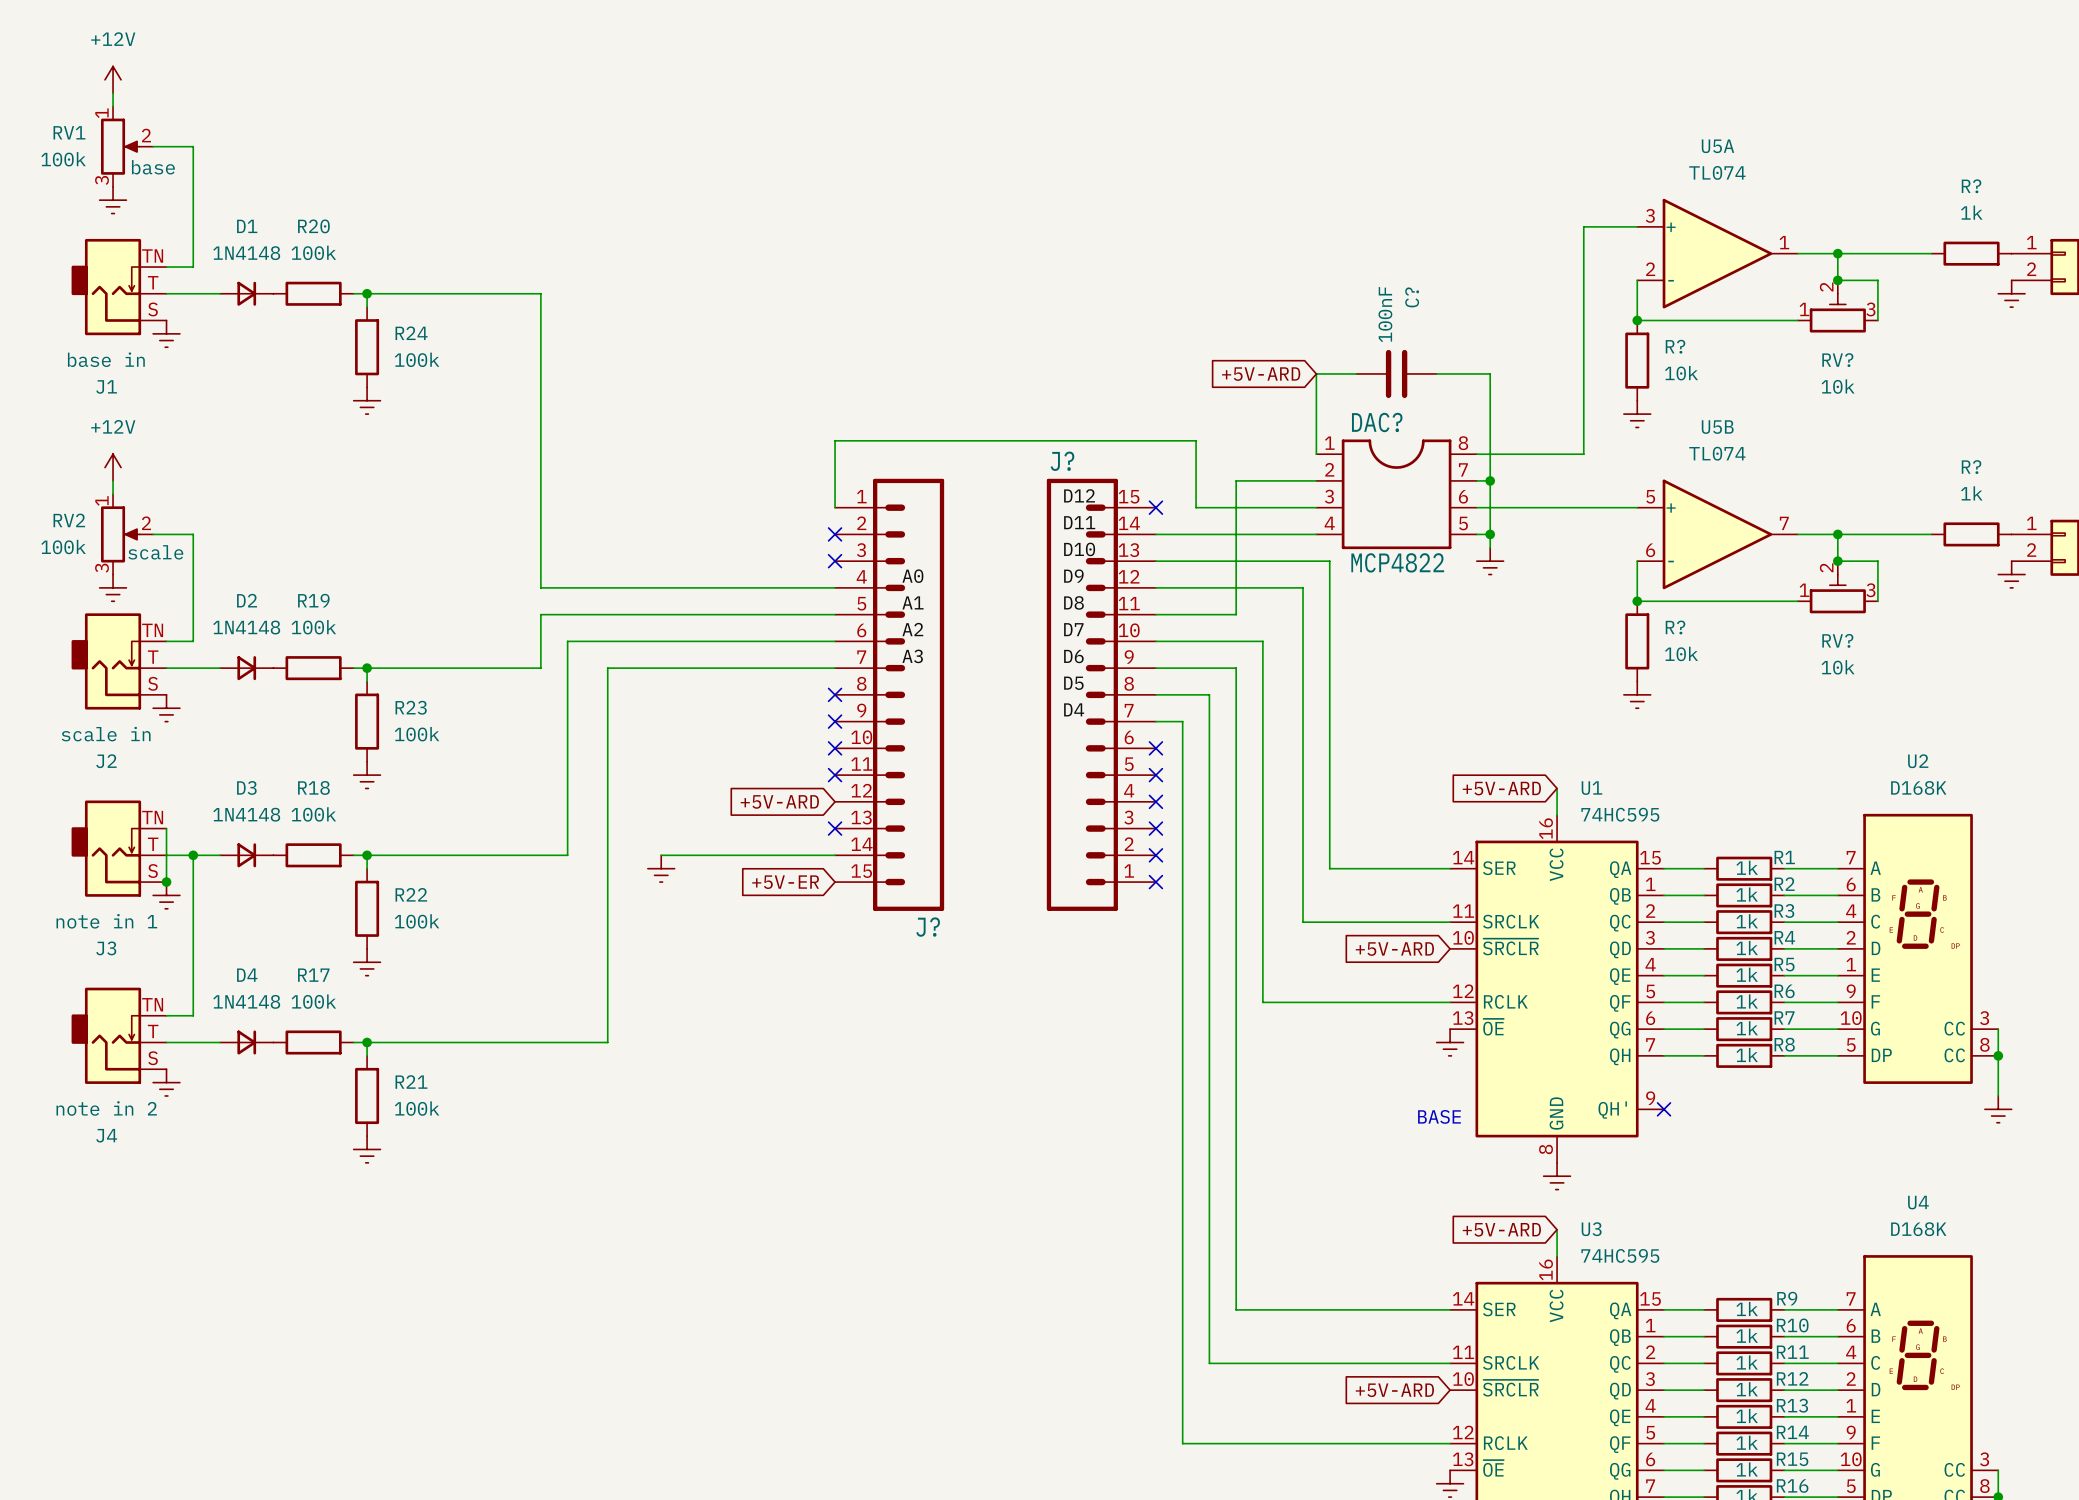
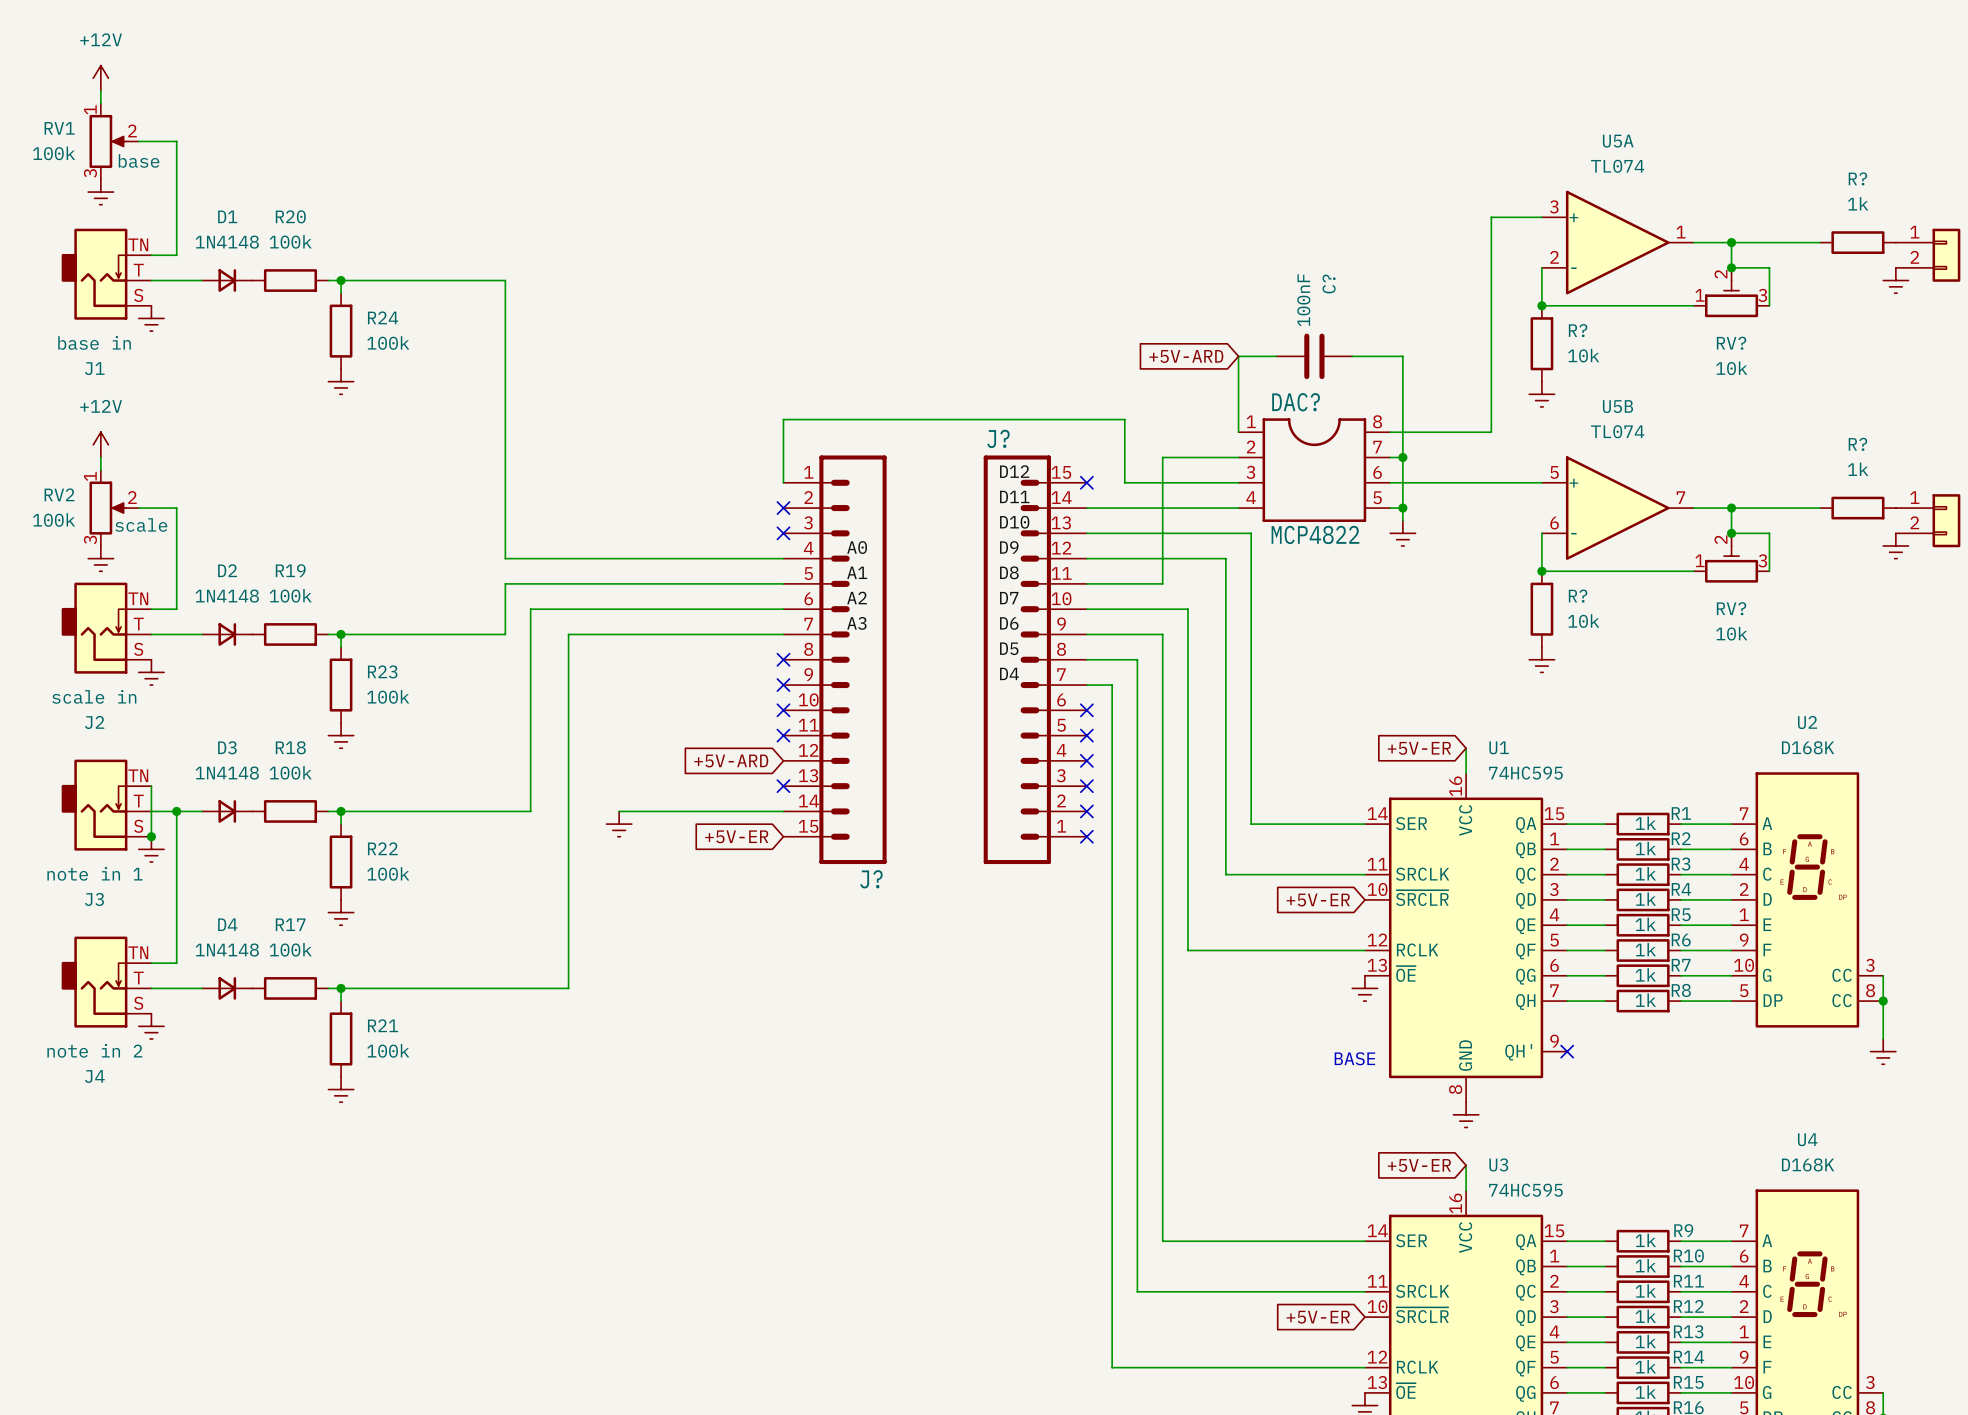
global label: +5V-ARD (1501, 788) -> +5V-ER (1419, 748)
global label: +5V-ARD (1394, 949) -> +5V-ER (1318, 900)
global label: +5V-ARD (1501, 1229) -> +5V-ER (1419, 1165)
global label: +5V-ARD (1394, 1390) -> +5V-ER (1318, 1317)

